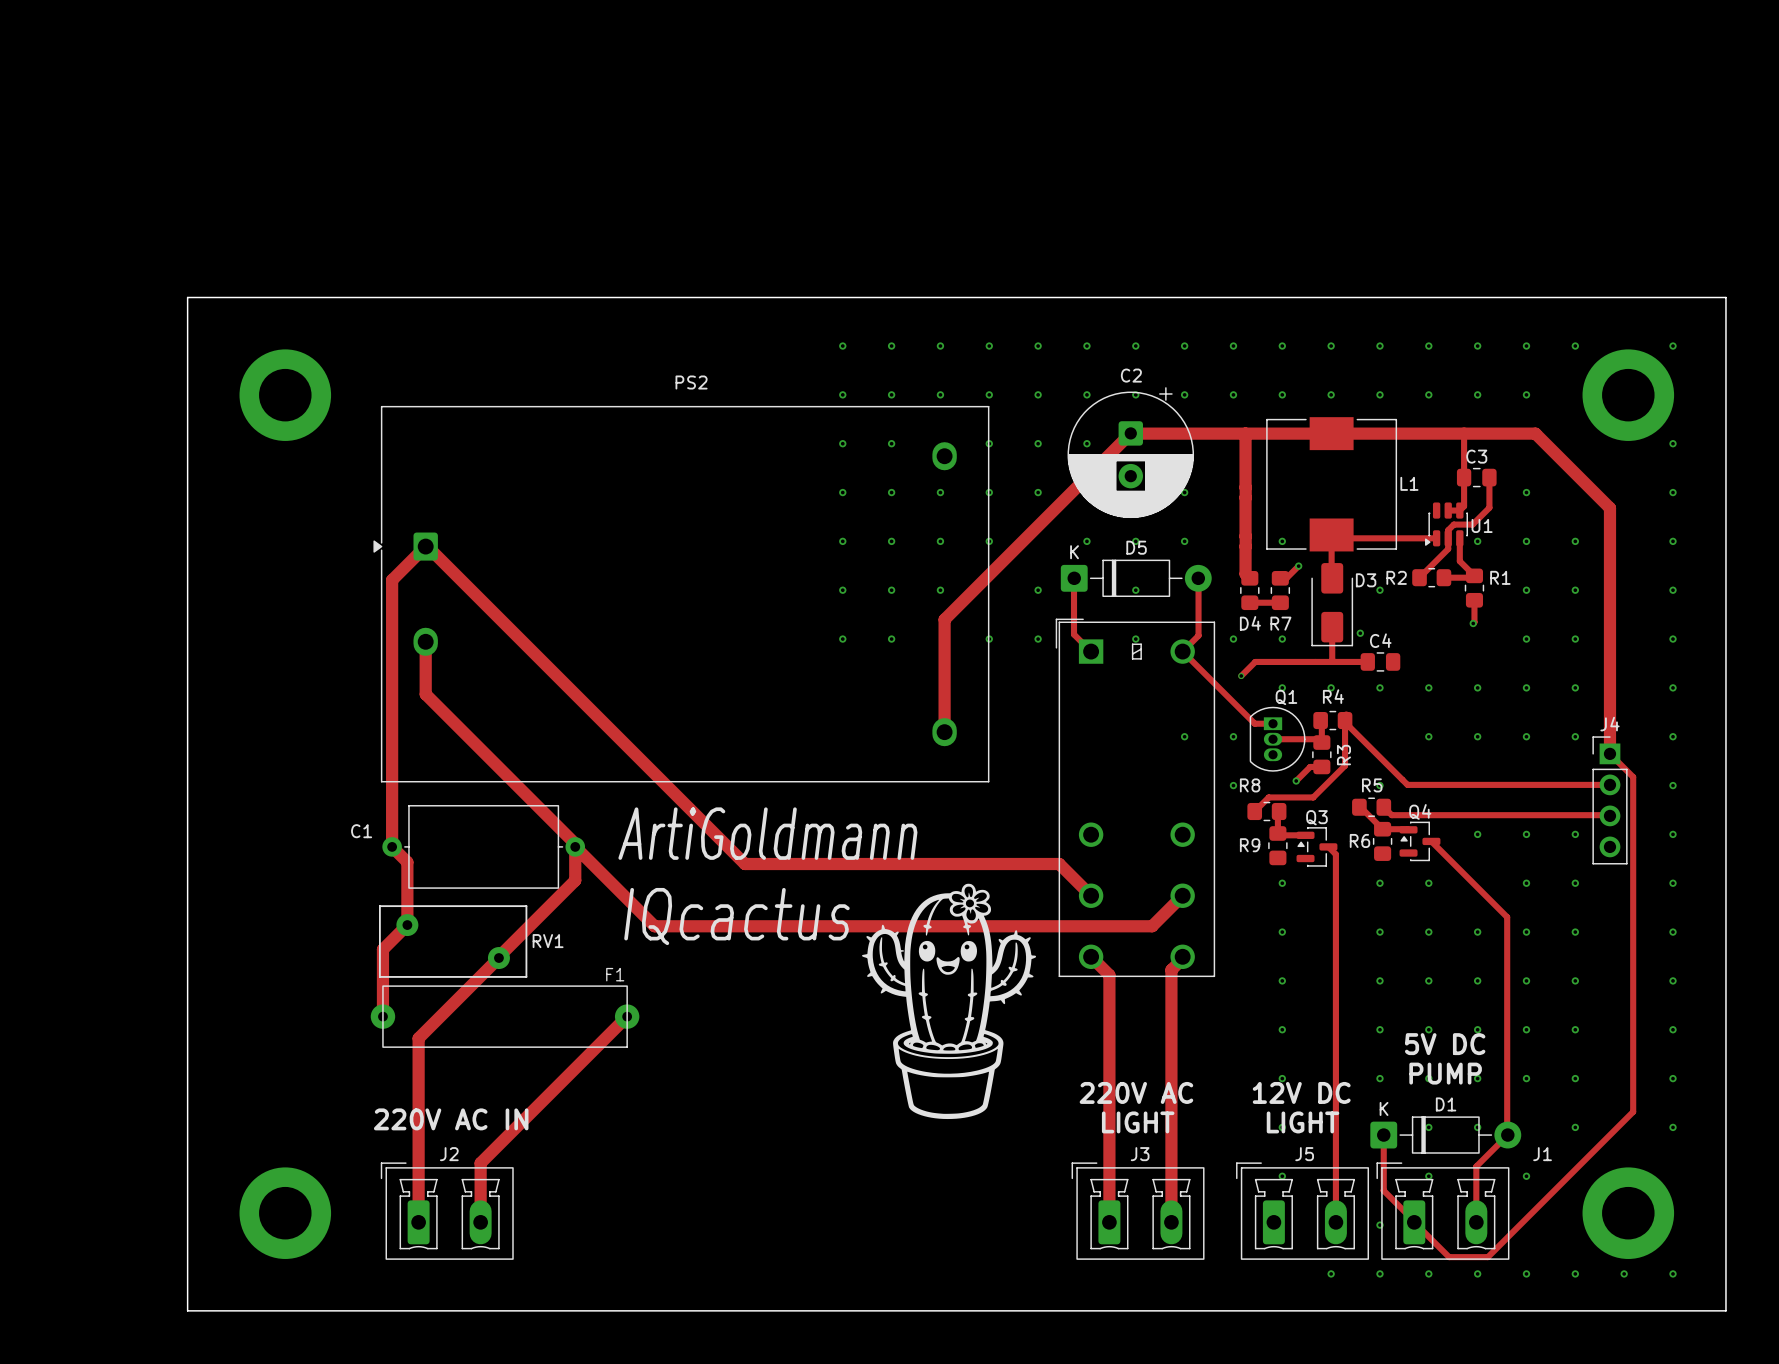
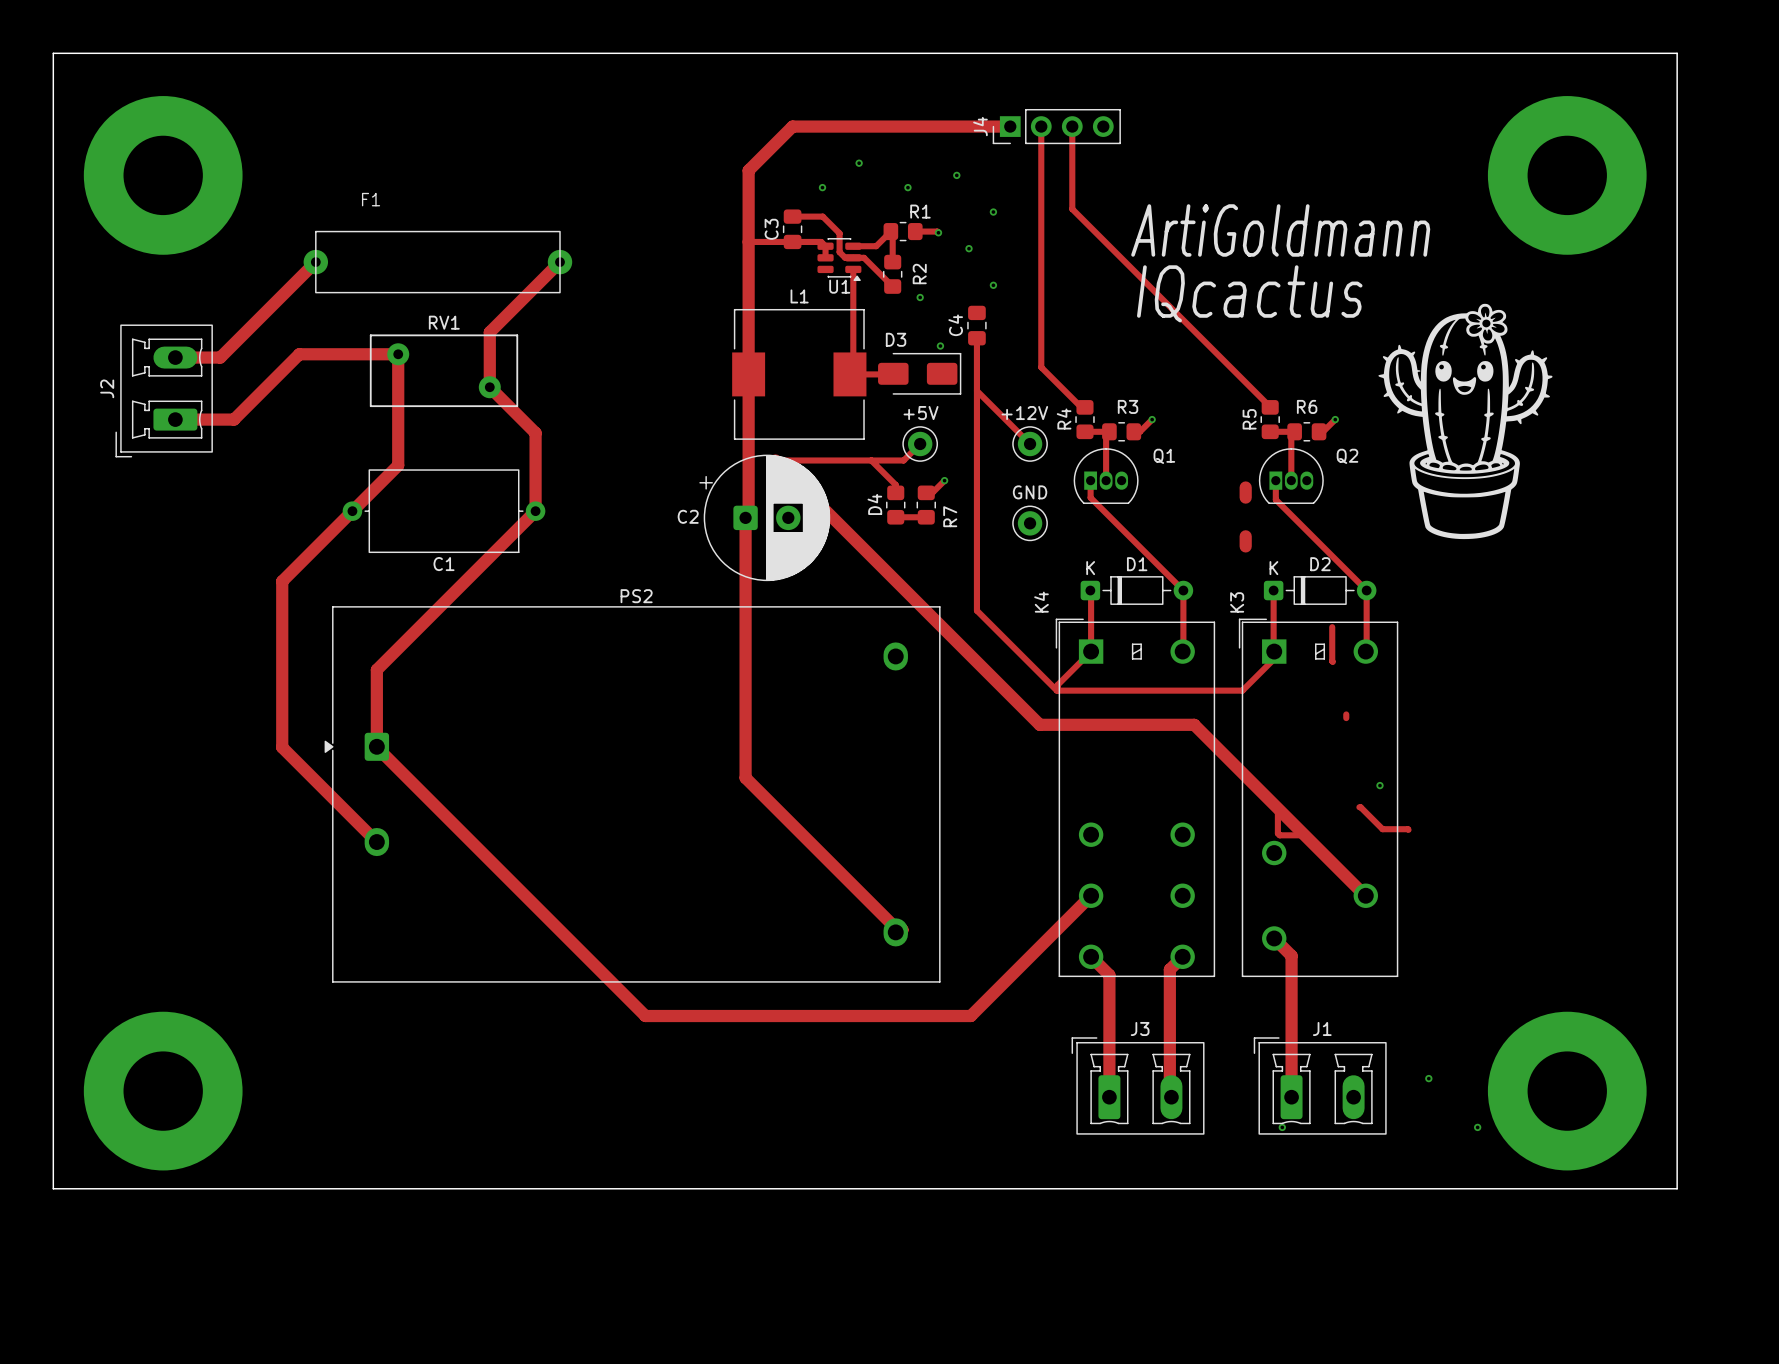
track: none -> (1010, 126) (792, 126) (748, 170) (748, 509) (745, 512) (745, 777) (897, 929) (902, 929) (895, 932)
track: none -> (1041, 126) (1041, 367) (1081, 407) (1084, 407)
track: none -> (1072, 126) (1072, 209) (1270, 407)
via: none -> (859, 163)
part: none -> (163, 175)
via: none -> (956, 175)
part: none -> (1567, 175)
via: none -> (822, 187)
via: none -> (907, 187)
via: none -> (993, 212)
track: none -> (792, 216) (822, 216) (839, 233) (839, 252) (845, 257) (864, 257) (892, 286)
text: none -> ArtiGoldmann (1280, 230)
track: none -> (915, 231) (938, 232)
via: none -> (938, 232)
track: none -> (748, 241) (821, 241) (825, 246) (825, 257)
track: none -> (853, 246) (876, 246) (890, 231) (892, 233) (892, 262)
via: none -> (969, 248)
track: none -> (311, 266) (315, 262) (220, 357) (175, 357)
track: none -> (853, 269) (853, 371) (849, 374) (893, 373)
via: none -> (993, 285)
text: none -> IQcactus (1249, 293)
board edge: (187, 297) (1725, 297) (1725, 1310) (187, 1310) (187, 297) -> (53, 53) (53, 1188) (1677, 1188) (1677, 53) (53, 53)
via: none -> (920, 297)
drawing: none -> [1378, 303, 1553, 540]
track: none -> (976, 338) (976, 610) (1056, 690) (1242, 690) (1274, 658) (1273, 590)
via: (842, 346) -> none
via: (891, 346) -> none
via: (989, 346) -> none
via: (1038, 346) -> none
via: (1086, 346) -> none
via: (1135, 346) -> none
via: (1184, 346) -> none
via: (1233, 346) -> none
via: (1282, 346) -> none
via: (1331, 346) -> none
via: (1379, 346) -> none
via: (1428, 346) -> none
via: (1477, 346) -> none
via: (1526, 346) -> none
via: (1575, 346) -> none
via: (1673, 346) -> none
PS2 name position: PS2 (691, 382) -> PS2 (636, 596)
track: none -> (976, 390) (1030, 444)
via: (842, 394) -> none
via: (891, 394) -> none
via: (940, 394) -> none
via: (989, 394) -> none
via: (1038, 394) -> none
via: (1086, 394) -> none
via: (1135, 394) -> none
via: (1184, 394) -> none
via: (1233, 394) -> none
via: (1282, 394) -> none
via position: (1331, 394) -> (1335, 419)
via: (1379, 394) -> none
via: (1428, 394) -> none
via: (1477, 394) -> none
via: (1526, 394) -> none
part: (285, 395) -> none
part: (1628, 395) -> none
track: none -> (175, 419) (234, 419) (299, 354) (398, 354) (398, 465) (282, 581) (282, 747) (376, 842)
via: none -> (1152, 419)
track: none -> (1335, 419) (1323, 431) (1319, 431)
track: none -> (1084, 431) (1109, 431) (1106, 435) (1106, 480)
track: none -> (1270, 431) (1294, 431) (1291, 435) (1291, 480)
track: (1245, 433) (1245, 487) -> none
track: (1464, 433) (1464, 506) (1459, 510) (1448, 510) -> none
via: (842, 443) -> none
via: (891, 443) -> none
via: (989, 443) -> none
via: (1038, 443) -> none
via: (1086, 443) -> none
via: (1673, 443) -> none
track: none -> (920, 444) (903, 460) (775, 460) (1039, 724) (1194, 724) (1365, 895)
+5V: none -> (920, 444)
+12V: none -> (1030, 444)
C2 rotation: 0° (1130, 452) -> 90° counterclockwise (764, 517)
C2 position: (1130, 452) -> (764, 517)
C3 name position: C3 (1476, 456) -> C3 (771, 229)
track: none -> (871, 460) (895, 484) (895, 492)
Q2: none -> (1291, 476)
C3 rotation: 0° (1476, 477) -> 90° clockwise (792, 229)
C3 position: (1476, 477) -> (792, 229)
track: (1489, 477) (1489, 507) (1472, 524) (1453, 524) (1448, 530) (1448, 549) (1419, 577) -> none
track: none -> (944, 480) (932, 492) (926, 492)
track: none -> (1090, 480) (1090, 497) (1183, 590) (1183, 650)
track: none -> (1275, 480) (1275, 499) (1366, 590) (1365, 651)
L1 name position: L1 (1409, 483) -> L1 (799, 296)
L1 rotation: 0° (1331, 484) -> 90° clockwise (799, 374)
L1 position: (1331, 484) -> (799, 374)
via: (842, 492) -> none
via: (891, 492) -> none
via position: (940, 492) -> (944, 480)
via: (989, 492) -> none
via: (1038, 492) -> none
via: (1184, 492) -> none
via: (1526, 492) -> none
via: (1673, 492) -> none
track: (1245, 497) (1245, 536) -> none
C1: none -> (444, 511)
track: none -> (895, 517) (926, 517)
GND: none -> (1030, 523)
U1 rotation: 0° (1446, 524) -> 90° counterclockwise (839, 259)
U1 position: (1446, 524) -> (839, 259)
U1 name position: U1 (1482, 525) -> U1 (839, 286)
track: (1436, 538) (1334, 538) (1331, 534) (1332, 578) -> none
track: (1459, 538) (1459, 561) (1474, 575) (1472, 577) (1443, 577) -> none
via: (842, 541) -> none
via: (891, 541) -> none
via: (940, 541) -> none
via: (989, 541) -> none
via: (1086, 541) -> none
via: (1135, 541) -> none
via: (1184, 541) -> none
via: (1282, 541) -> none
via: (1477, 541) -> none
via: (1526, 541) -> none
via: (1575, 541) -> none
via: (1673, 541) -> none
track: (1245, 546) (1245, 574) (1249, 578) -> none
track: (1298, 566) (1286, 578) (1280, 578) -> (1152, 419) (1139, 431) (1133, 431)
via: (1298, 566) -> none
R2 name position: R2 (1396, 577) -> R2 (919, 274)
R2 rotation: 0° (1431, 577) -> 90° clockwise (892, 274)
R2 position: (1431, 577) -> (892, 274)
track: (1077, 578) (1074, 582) (1074, 634) (1091, 651) -> none
D5: (1136, 578) -> none
track: (1201, 578) (1198, 581) (1198, 635) (1182, 651) (1254, 723) (1273, 723) -> none
R1 rotation: 0° (1474, 588) -> 90° clockwise (903, 231)
R1 position: (1474, 588) -> (903, 231)
via: (842, 590) -> none
via: (891, 590) -> none
via: (940, 590) -> none
via: (1038, 590) -> none
track: none -> (1090, 590) (1091, 651) (1057, 685) (1057, 690)
via: (1135, 590) -> none
D4 position: (1249, 590) -> (895, 505)
R7 position: (1280, 590) -> (926, 505)
D2: none -> (1320, 590)
via: (1379, 590) -> none
via: (1526, 590) -> none
via: (1575, 590) -> none
via: (1673, 590) -> none
PS2 position: (681, 594) -> (632, 794)
track: (1474, 600) (1473, 623) -> none
K4 name: none -> K4 (1041, 602)
track: (1249, 602) (1280, 602) -> none
D3 rotation: 0° (1332, 604) -> 90° counterclockwise (919, 373)
D3 position: (1332, 604) -> (919, 373)
D4 name rotation: 0° (1250, 623) -> 90° counterclockwise (874, 504)
D4 name position: D4 (1250, 623) -> D4 (874, 504)
R7 name rotation: 0° (1280, 623) -> 90° counterclockwise (950, 516)
R7 name position: R7 (1280, 623) -> R7 (950, 516)
via: (1473, 623) -> none
via: (1360, 633) -> none
via: (842, 639) -> none
via: (891, 639) -> none
via: (989, 639) -> none
via: (1038, 639) -> none
via: (1135, 639) -> none
via: (1233, 639) -> none
via: (1282, 639) -> none
via: (1526, 639) -> none
via: (1575, 639) -> none
via: (1673, 639) -> none
C4 name position: C4 (1380, 640) -> C4 (955, 325)
track: (425, 641) (425, 694) (575, 843) (575, 880) (418, 1038) (418, 1222) -> none
track: (1367, 661) (1255, 661) (1241, 675) -> none
C4 rotation: 0° (1380, 661) -> 90° clockwise (976, 325)
C4 position: (1380, 661) -> (976, 325)
via: (1241, 675) -> none
via: (1282, 687) -> none
via: (1331, 687) -> none
via: (1379, 687) -> none
via: (1428, 687) -> none
via: (1477, 687) -> none
via: (1526, 687) -> none
via: (1575, 687) -> none
via: (1673, 687) -> none
R4 name position: R4 (1333, 696) -> R4 (1064, 419)
Q1 name position: Q1 (1286, 697) -> Q1 (1164, 456)
track: (1321, 718) (1321, 742) (1318, 739) (1273, 739) -> none
R4 rotation: 0° (1332, 720) -> 90° clockwise (1084, 419)
R4 position: (1332, 720) -> (1084, 419)
track: (1345, 720) (1345, 765) (1313, 797) (1268, 797) (1254, 811) -> none
track: (1345, 722) (1407, 784) (1609, 784) -> none
track: (944, 732) (944, 619) (1130, 433) (1535, 433) (1609, 508) (1609, 753) (1633, 777) (1633, 1111) (1487, 1257) (1449, 1257) (1383, 1190) -> none
via: (1184, 736) -> none
via: (1233, 736) -> none
via: (1428, 736) -> none
via: (1477, 736) -> none
via: (1526, 736) -> none
via: (1575, 736) -> none
via: (1673, 736) -> none
Q1 rotation: 0° (1277, 739) -> 90° counterclockwise (1106, 476)
Q1 position: (1277, 739) -> (1106, 476)
R3 rotation: 0° (1321, 754) -> 90° clockwise (1121, 431)
R3 position: (1321, 754) -> (1121, 431)
R3 name position: R3 (1343, 755) -> R3 (1128, 406)
track: (1321, 766) (1310, 766) (1296, 780) -> none
via: (1296, 780) -> none
via: (1233, 785) -> none
R5 name position: R5 (1372, 785) -> R5 (1249, 419)
via: (1673, 785) -> none
K3: none -> (1318, 797)
J4 rotation: 0° (1609, 800) -> 90° counterclockwise (1056, 126)
J4 position: (1609, 800) -> (1056, 126)
R5 rotation: 0° (1371, 807) -> 90° clockwise (1270, 419)
R5 position: (1371, 807) -> (1270, 419)
track: (1383, 807) (1391, 815) (1609, 815) -> none
R8: (1266, 811) -> none
text: C1 (361, 831) -> none
text: ArtiGoldmann (767, 833) -> none
via: (1477, 834) -> none
via: (1526, 834) -> none
via: (1575, 834) -> none
via: (1673, 834) -> none
R6 rotation: 0° (1382, 841) -> 90° clockwise (1306, 431)
R6 position: (1382, 841) -> (1306, 431)
Q4: (1419, 841) -> none
track: (1431, 841) (1507, 917) (1507, 1135) (1476, 1166) (1476, 1222) -> none
R9: (1277, 845) -> none
part: (483, 846) -> none
track: (575, 846) (654, 926) (1152, 926) (1182, 895) -> none
Q3: (1316, 846) -> none
track: (1328, 846) (1335, 854) (1335, 1222) -> none
drawing: [862, 883, 1037, 1120] -> none
via: (1282, 883) -> none
via: (1379, 883) -> none
via: (1428, 883) -> none
via: (1526, 883) -> none
via: (1575, 883) -> none
via: (1673, 883) -> none
track: (1091, 895) (1059, 864) (744, 864) (425, 546) (392, 580) (392, 846) (407, 862) (407, 925) (382, 949) (382, 1016) -> (1091, 895) (970, 1016) (645, 1016) (376, 747) (376, 669) (535, 511) (535, 433) (489, 387) (489, 332) (560, 262)
text: IQcactus (736, 916) -> none
via: (1282, 932) -> none
via: (1379, 932) -> none
via: (1428, 932) -> none
via: (1477, 932) -> none
via: (1526, 932) -> none
via: (1575, 932) -> none
via: (1673, 932) -> none
track: none -> (1274, 938) (1291, 955) (1291, 1097)
RV1 position: (453, 941) -> (444, 370)
RV1 name position: RV1 (548, 941) -> RV1 (444, 322)
track: (1182, 956) (1171, 969) (1171, 1222) -> (1182, 956) (1169, 969) (1169, 1095) (1171, 1097)
F1 name position: F1 (615, 974) -> F1 (371, 199)
via: (1282, 980) -> none
via: (1379, 980) -> none
via: (1428, 980) -> none
via: (1477, 980) -> none
via: (1526, 980) -> none
via: (1575, 980) -> none
via: (1673, 980) -> none
F1 position: (505, 1016) -> (437, 262)
track: (627, 1016) (480, 1163) (480, 1222) -> none
via: (1282, 1029) -> none
via: (1379, 1029) -> none
via: (1428, 1029) -> none
via: (1477, 1029) -> none
via: (1526, 1029) -> none
via: (1575, 1029) -> none
via: (1673, 1029) -> none
text: 5V DC (1445, 1044) -> none
text: PUMP (1445, 1073) -> none
via: (1282, 1078) -> none
via: (1379, 1078) -> none
via: (1477, 1078) -> none
via: (1526, 1078) -> none
via: (1575, 1078) -> none
via: (1673, 1078) -> none
part: none -> (163, 1091)
part: none -> (1567, 1091)
text: 220V AC (1136, 1092) -> none
text: 12V DC (1301, 1092) -> none
track: (1109, 1097) (1109, 1222) -> none
D1 footprint: [1370, 1116, 1522, 1154] -> [1080, 576, 1194, 605]
text: 220V AC IN (451, 1119) -> none
text: LIGHT (1138, 1122) -> none
text: LIGHT (1303, 1122) -> none
via: (1428, 1127) -> none
via: (1575, 1127) -> none
via: (1673, 1127) -> none
track: (1383, 1135) (1383, 1190) -> none
J1 name position: J1 (1542, 1154) -> J1 (1322, 1028)
via: (1282, 1176) -> none
via: (1428, 1176) -> none
via: (1526, 1176) -> none
J2 rotation: 0° (447, 1211) -> 90° counterclockwise (164, 390)
J2 position: (447, 1211) -> (164, 390)
J3 position: (1138, 1211) -> (1138, 1085)
J5: (1302, 1211) -> none
J1 position: (1442, 1211) -> (1320, 1085)
part: (285, 1213) -> none
part: (1628, 1213) -> none
via: (1379, 1225) -> none
via: (1331, 1273) -> none
via: (1379, 1273) -> none
via: (1428, 1273) -> none
via: (1477, 1273) -> none
via: (1526, 1273) -> none
via: (1575, 1273) -> none
via: (1624, 1273) -> none
via: (1673, 1273) -> none

